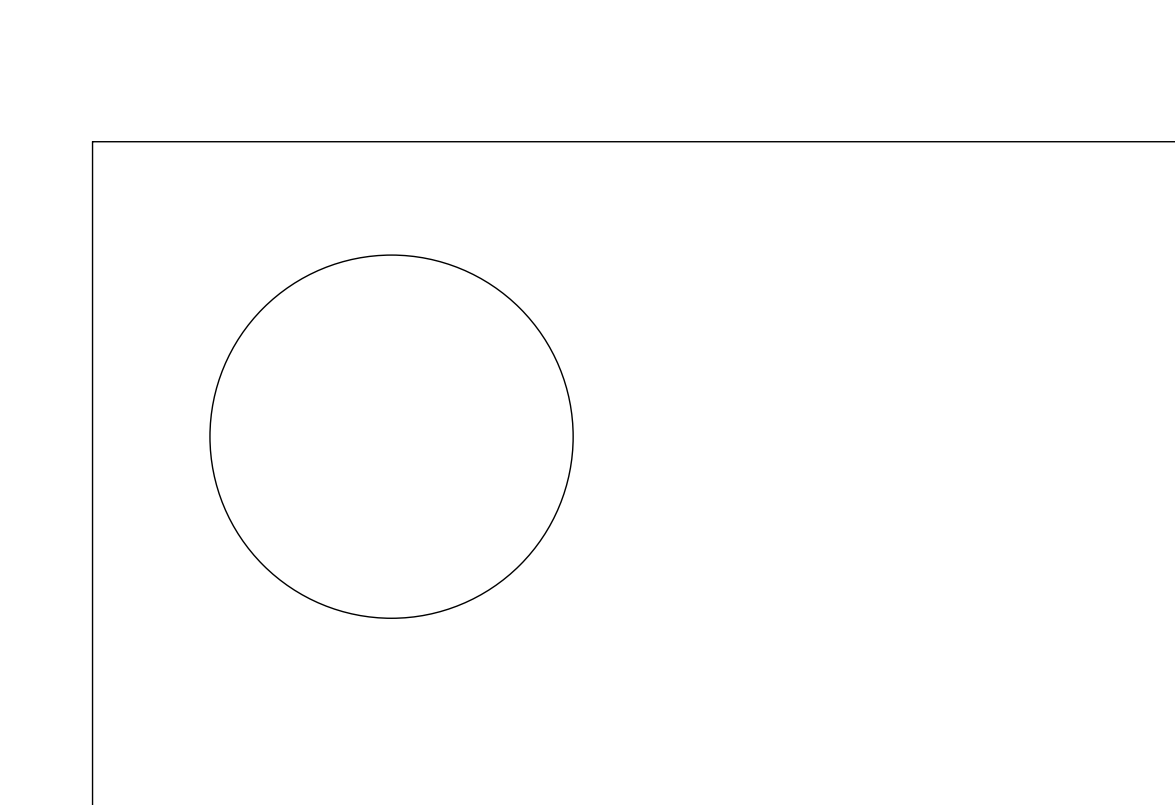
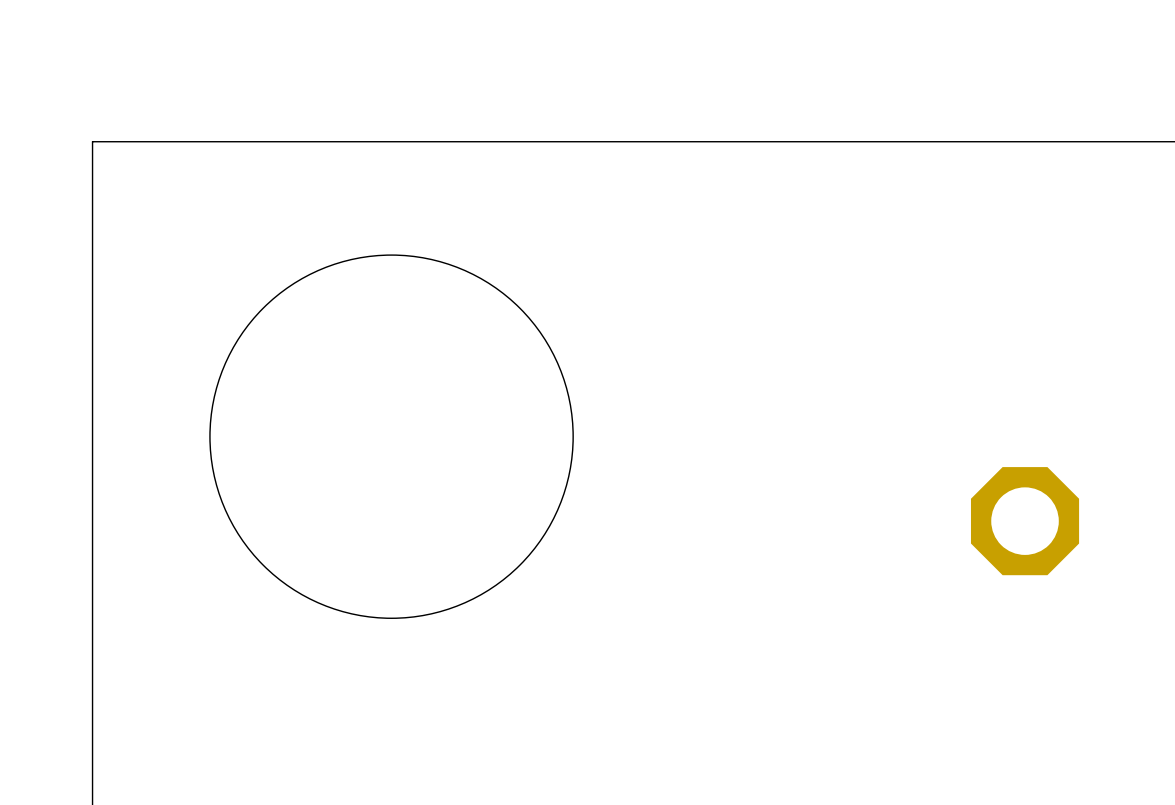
part: none -> (1025, 521)

